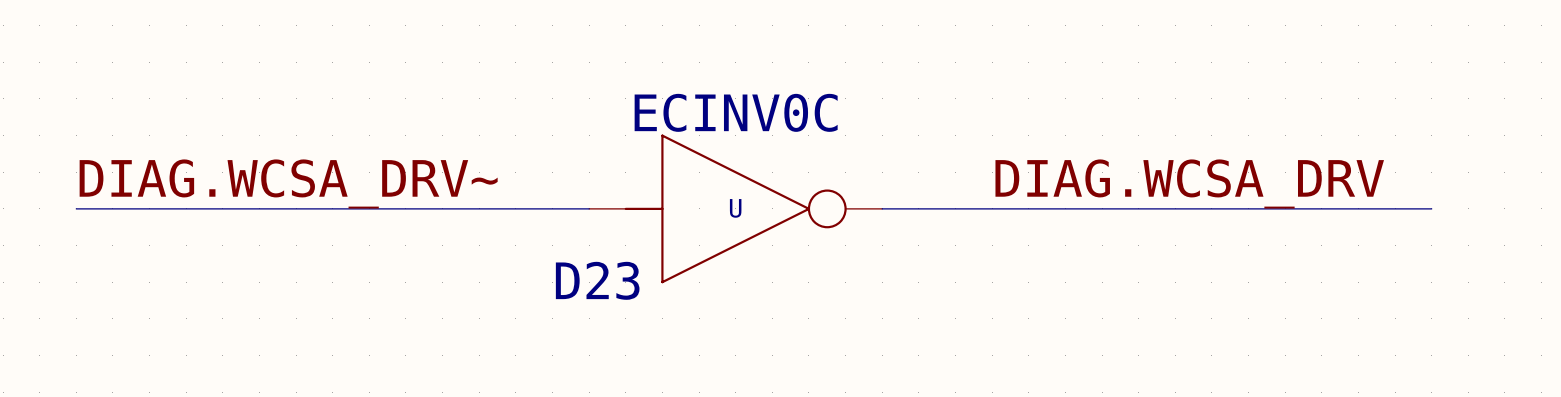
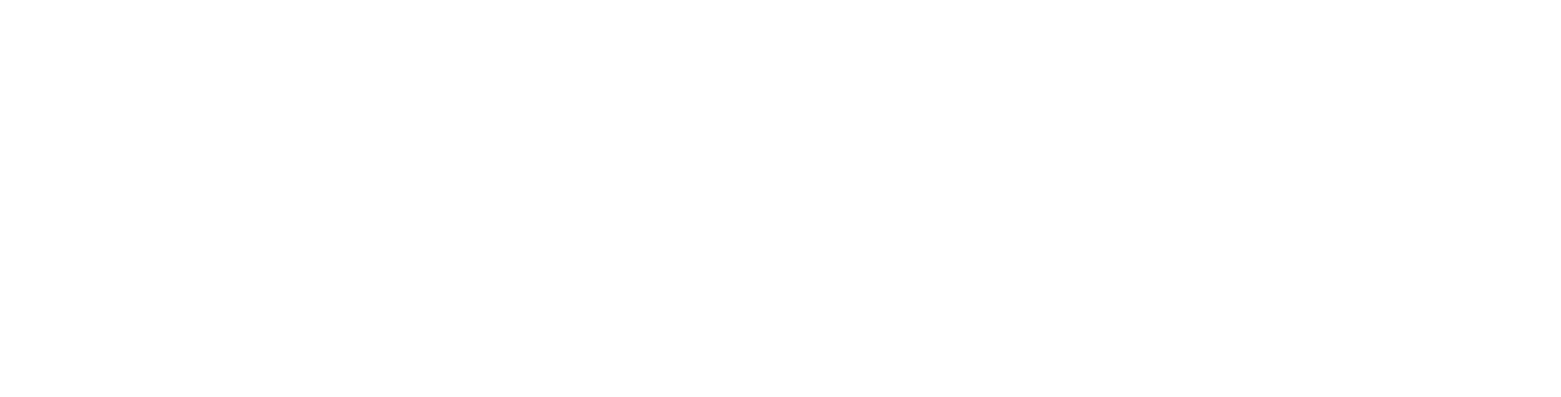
label: DIAG.WCSA_DRV~ (288, 183) -> none
label: DIAG.WCSA_DRV (1189, 183) -> none
wire: (76, 208) (589, 208) -> none
U: (735, 208) -> none
wire: (882, 208) (1431, 208) -> none

